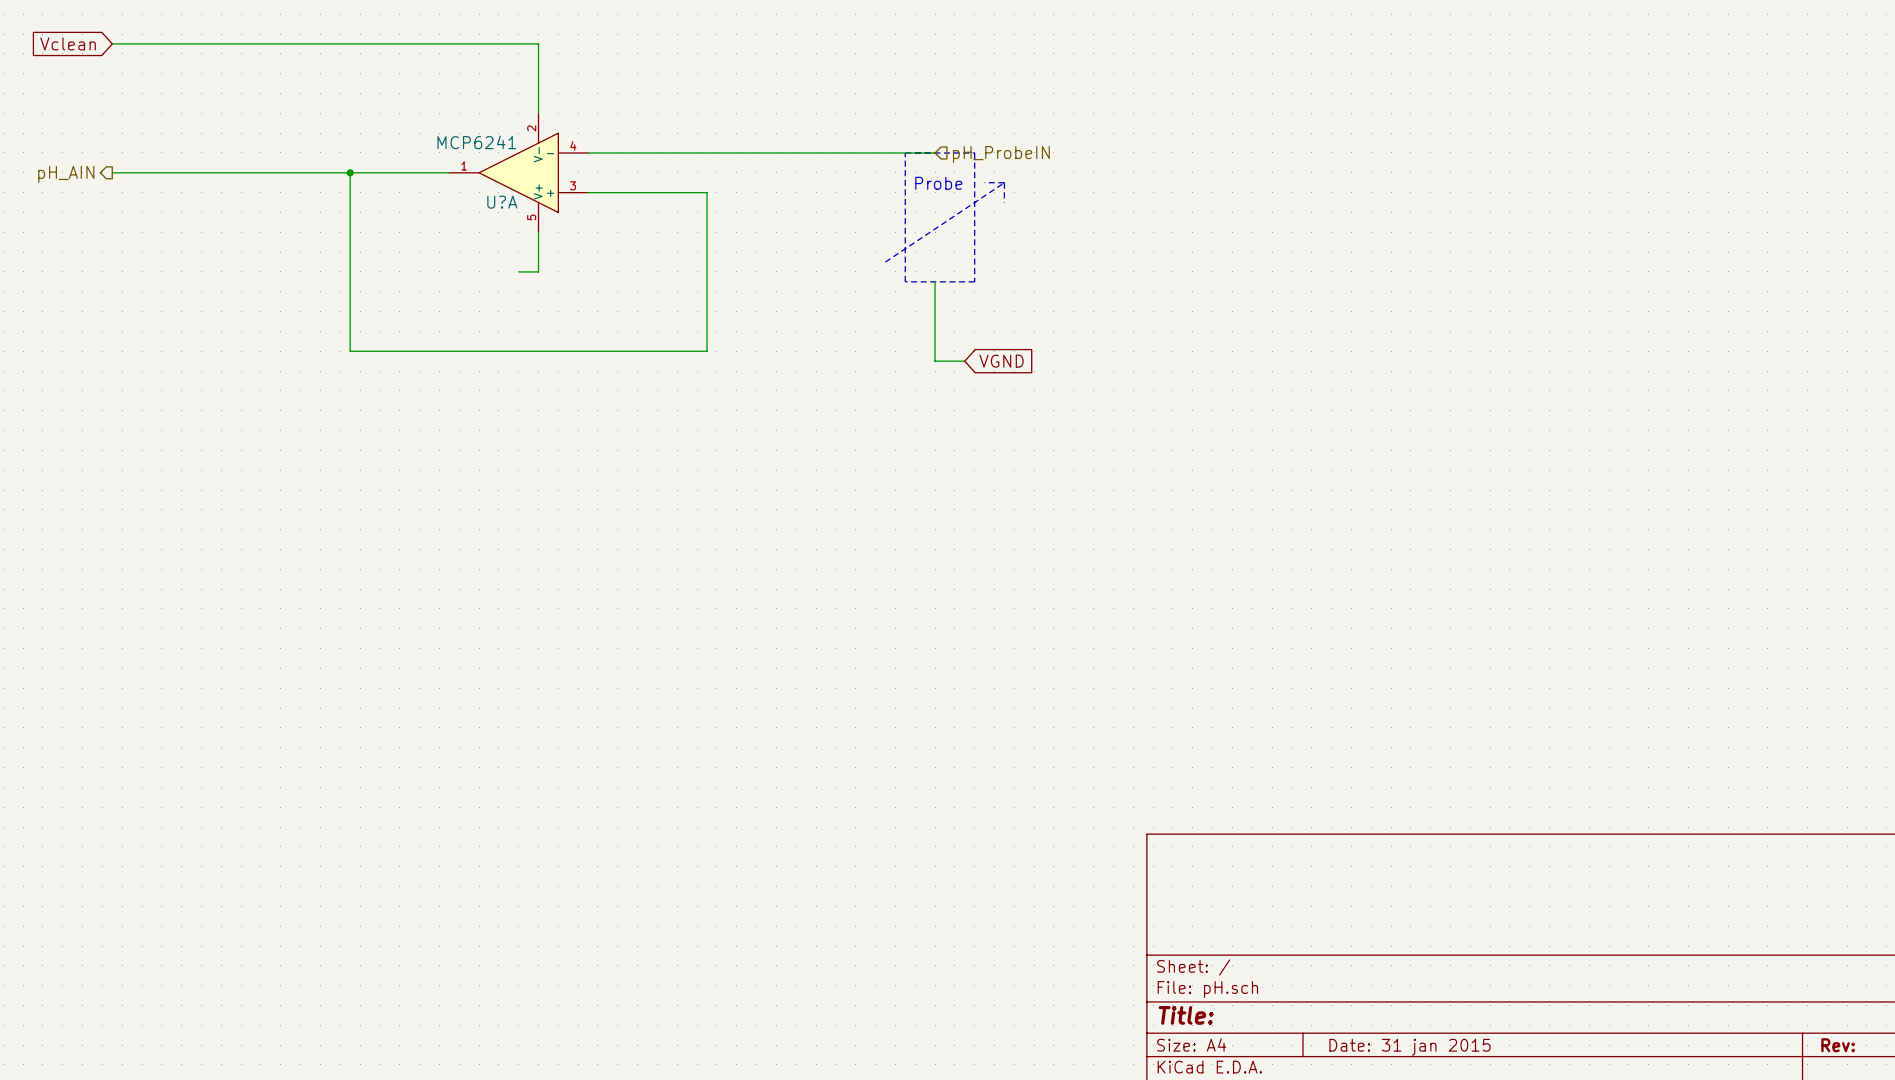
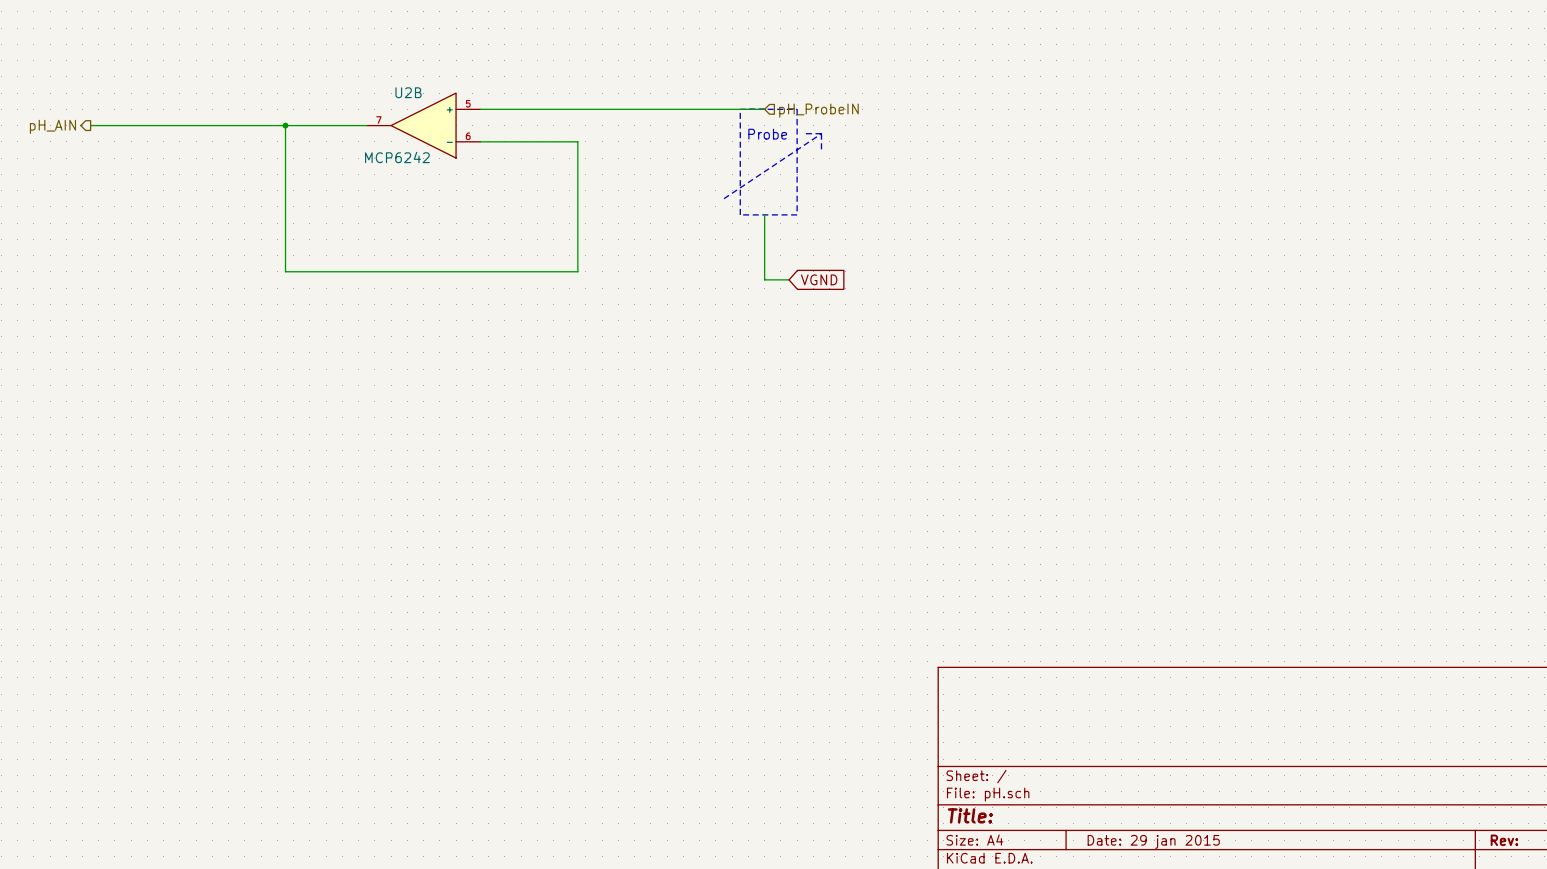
global label: Vclean (68, 43) -> none
wire: (112, 43) (538, 43) (538, 113) -> none
U?A: MCP6241 (518, 172) -> none
U2B: none -> MCP6242 (423, 125)
wire: (538, 232) (538, 271) (518, 271) -> none
title block: Date: 31 jan 2015 (1409, 1047) -> Date: 29 jan 2015 (1153, 841)

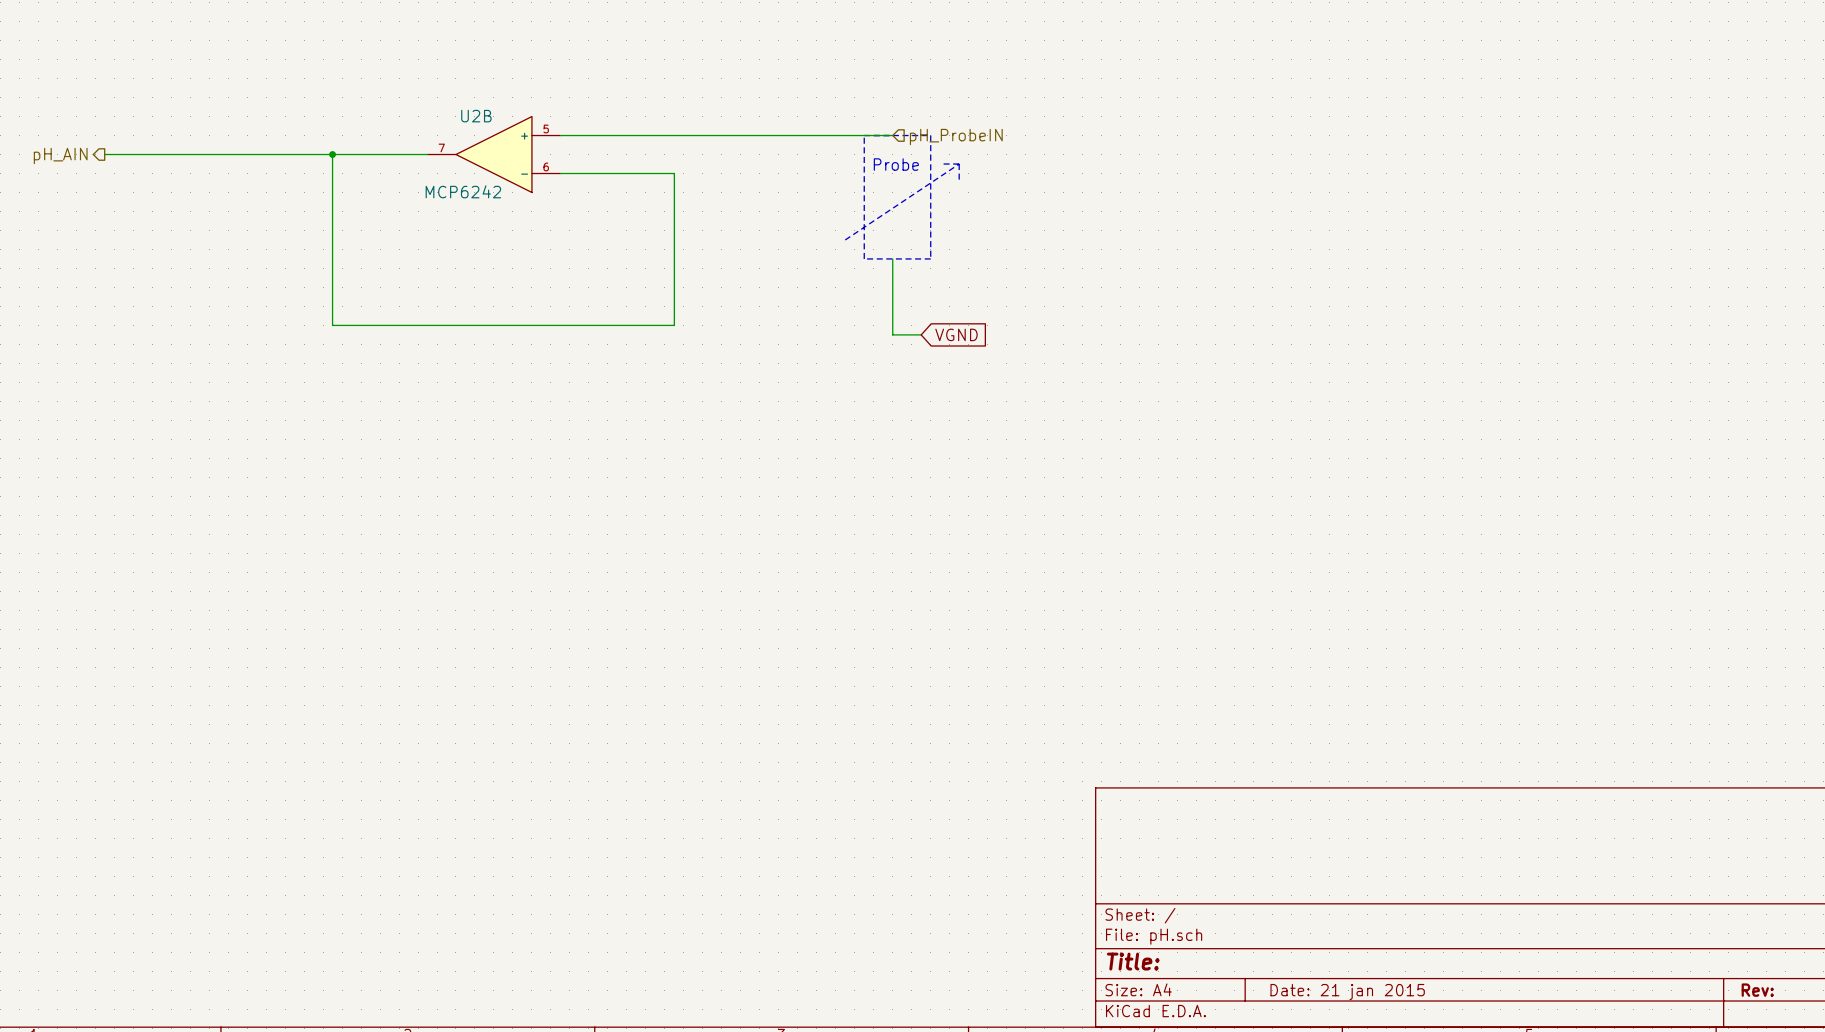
title block: Date: 29 jan 2015 (1153, 841) -> Date: 21 jan 2015 (1347, 991)

